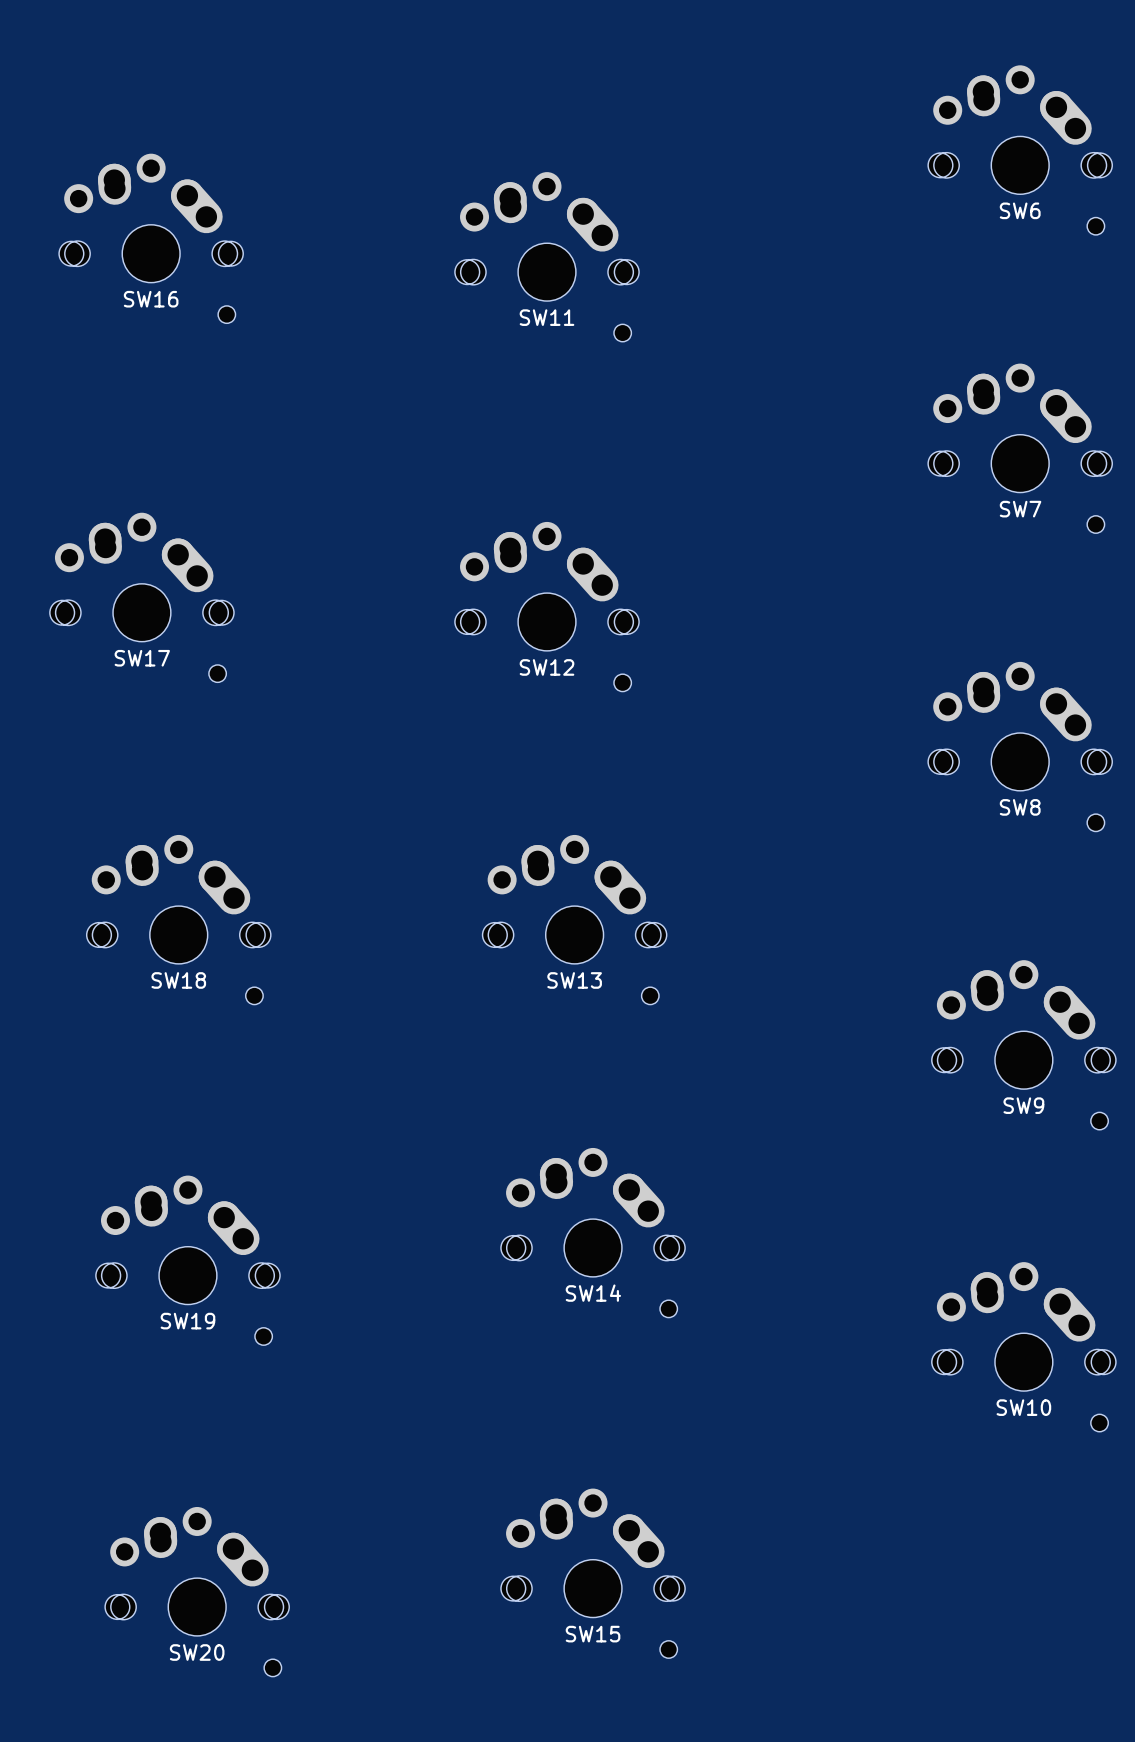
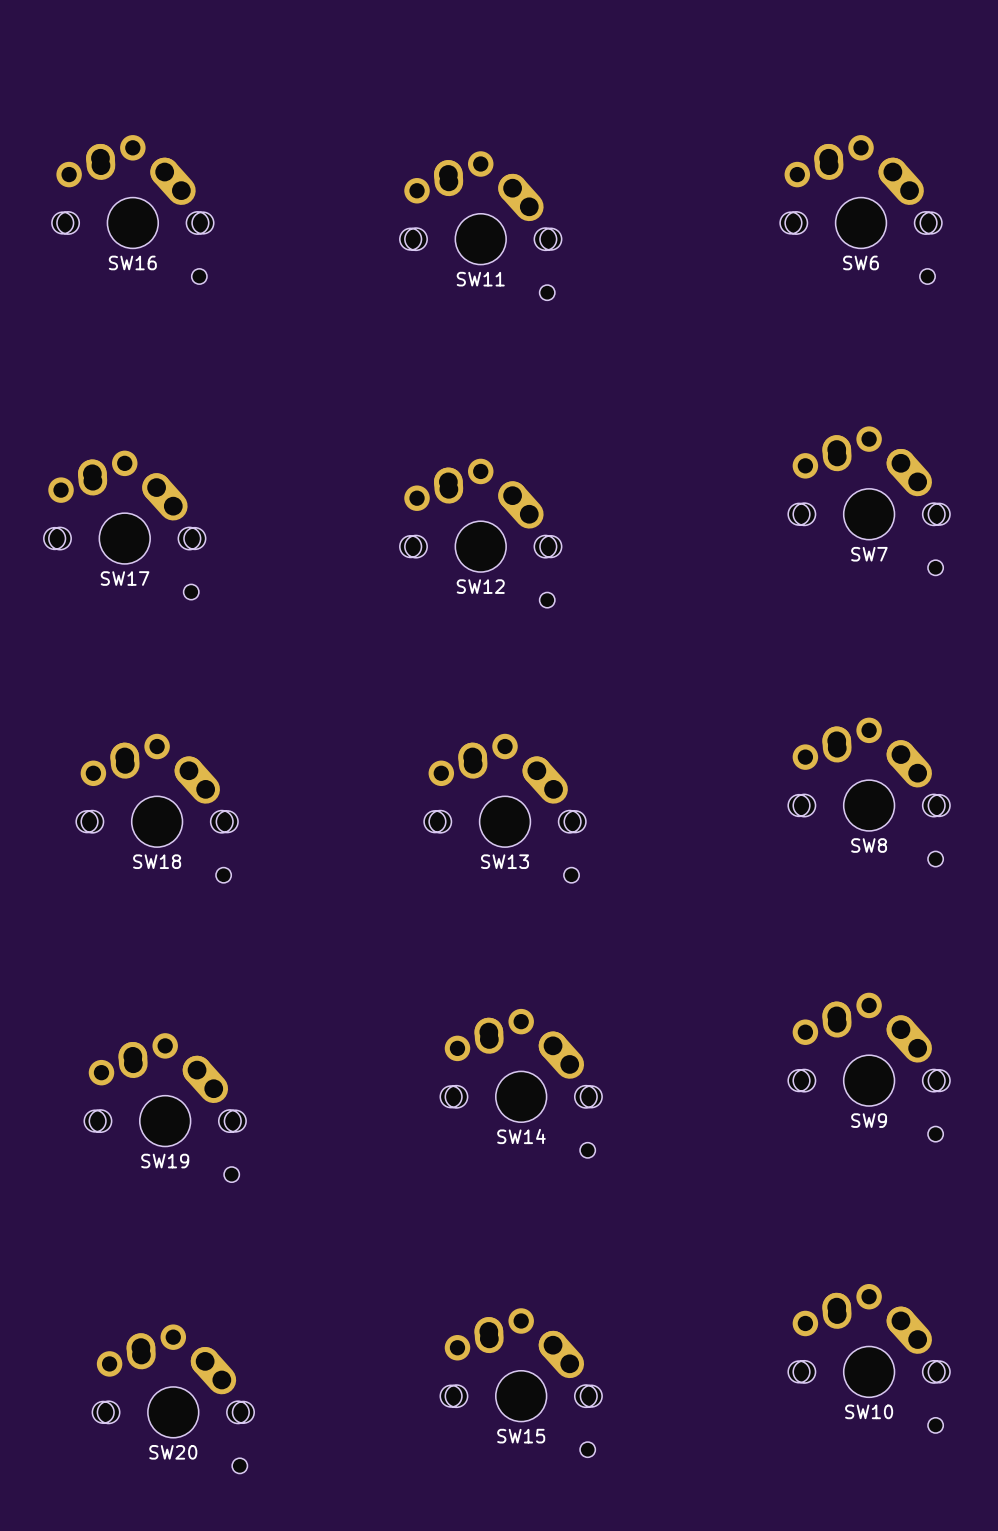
SW6 position: (1020, 150) -> (861, 209)
SW7 footprint: [928, 363, 1113, 534] -> [788, 426, 951, 576]
SW8 footprint: [928, 661, 1113, 832] -> [788, 717, 951, 867]
SW9 footprint: [931, 960, 1116, 1130] -> [788, 992, 951, 1142]
SW10 footprint: [931, 1262, 1116, 1432] -> [788, 1283, 951, 1434]

